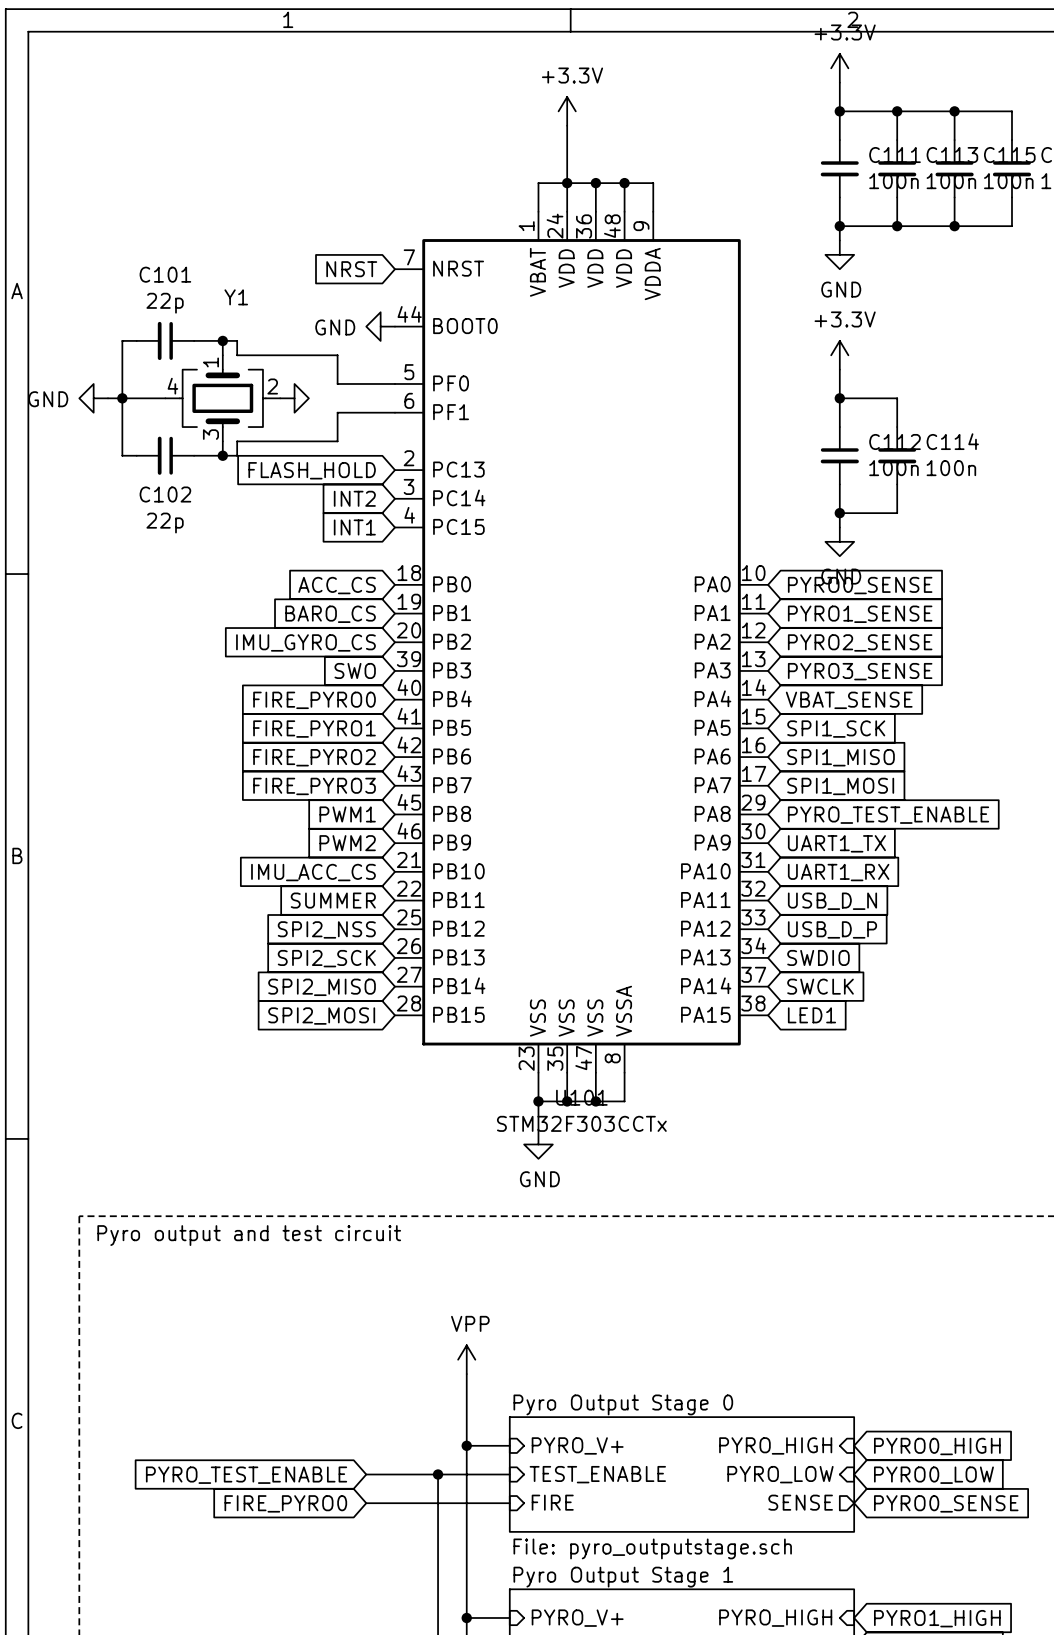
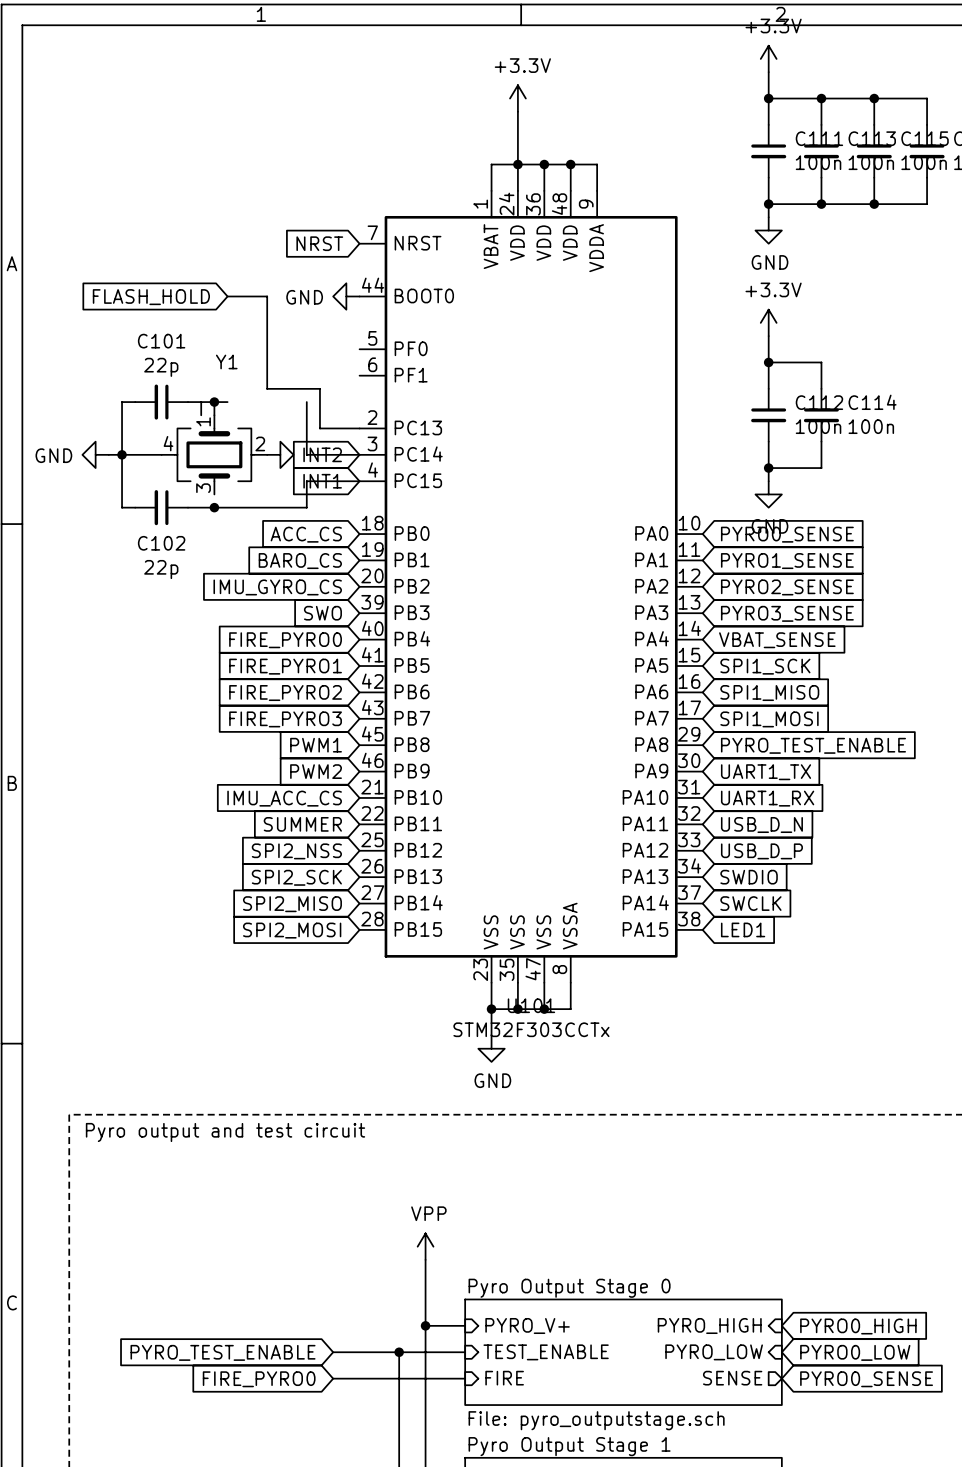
wire: none -> (227, 296) (267, 296) (267, 388) (319, 388) (319, 428) (359, 428)
wire: (136, 340) (122, 340) (122, 455) (136, 455) -> (135, 402) (122, 402) (122, 507) (135, 507)
C101 position: (165, 340) -> (161, 402)
wire: (194, 340) (237, 340) (237, 355) (337, 355) (337, 383) (394, 383) -> none
wire: (222, 340) (222, 355) -> none
junction: (222, 340) -> none
power symbol position: GND (93, 398) -> GND (95, 454)
wire: (108, 398) (165, 398) -> (108, 454) (161, 454)
junction: (122, 398) -> none
Y1 position: (222, 398) -> (214, 454)
power symbol position: (294, 398) -> (280, 454)
wire: (394, 412) (337, 412) (337, 441) (251, 441) -> none
wire: none -> (188, 402) (214, 402)
wire: none -> (306, 402) (306, 454) (359, 454)
C102 position: (165, 455) -> (161, 507)
wire: (194, 455) (237, 455) -> none
junction position: (222, 455) -> (214, 402)
global label position: FLASH_HOLD (312, 470) -> FLASH_HOLD (151, 297)
junction: none -> (122, 454)
wire: none -> (359, 481) (306, 481) (306, 507) (188, 507)
junction: none -> (214, 507)

